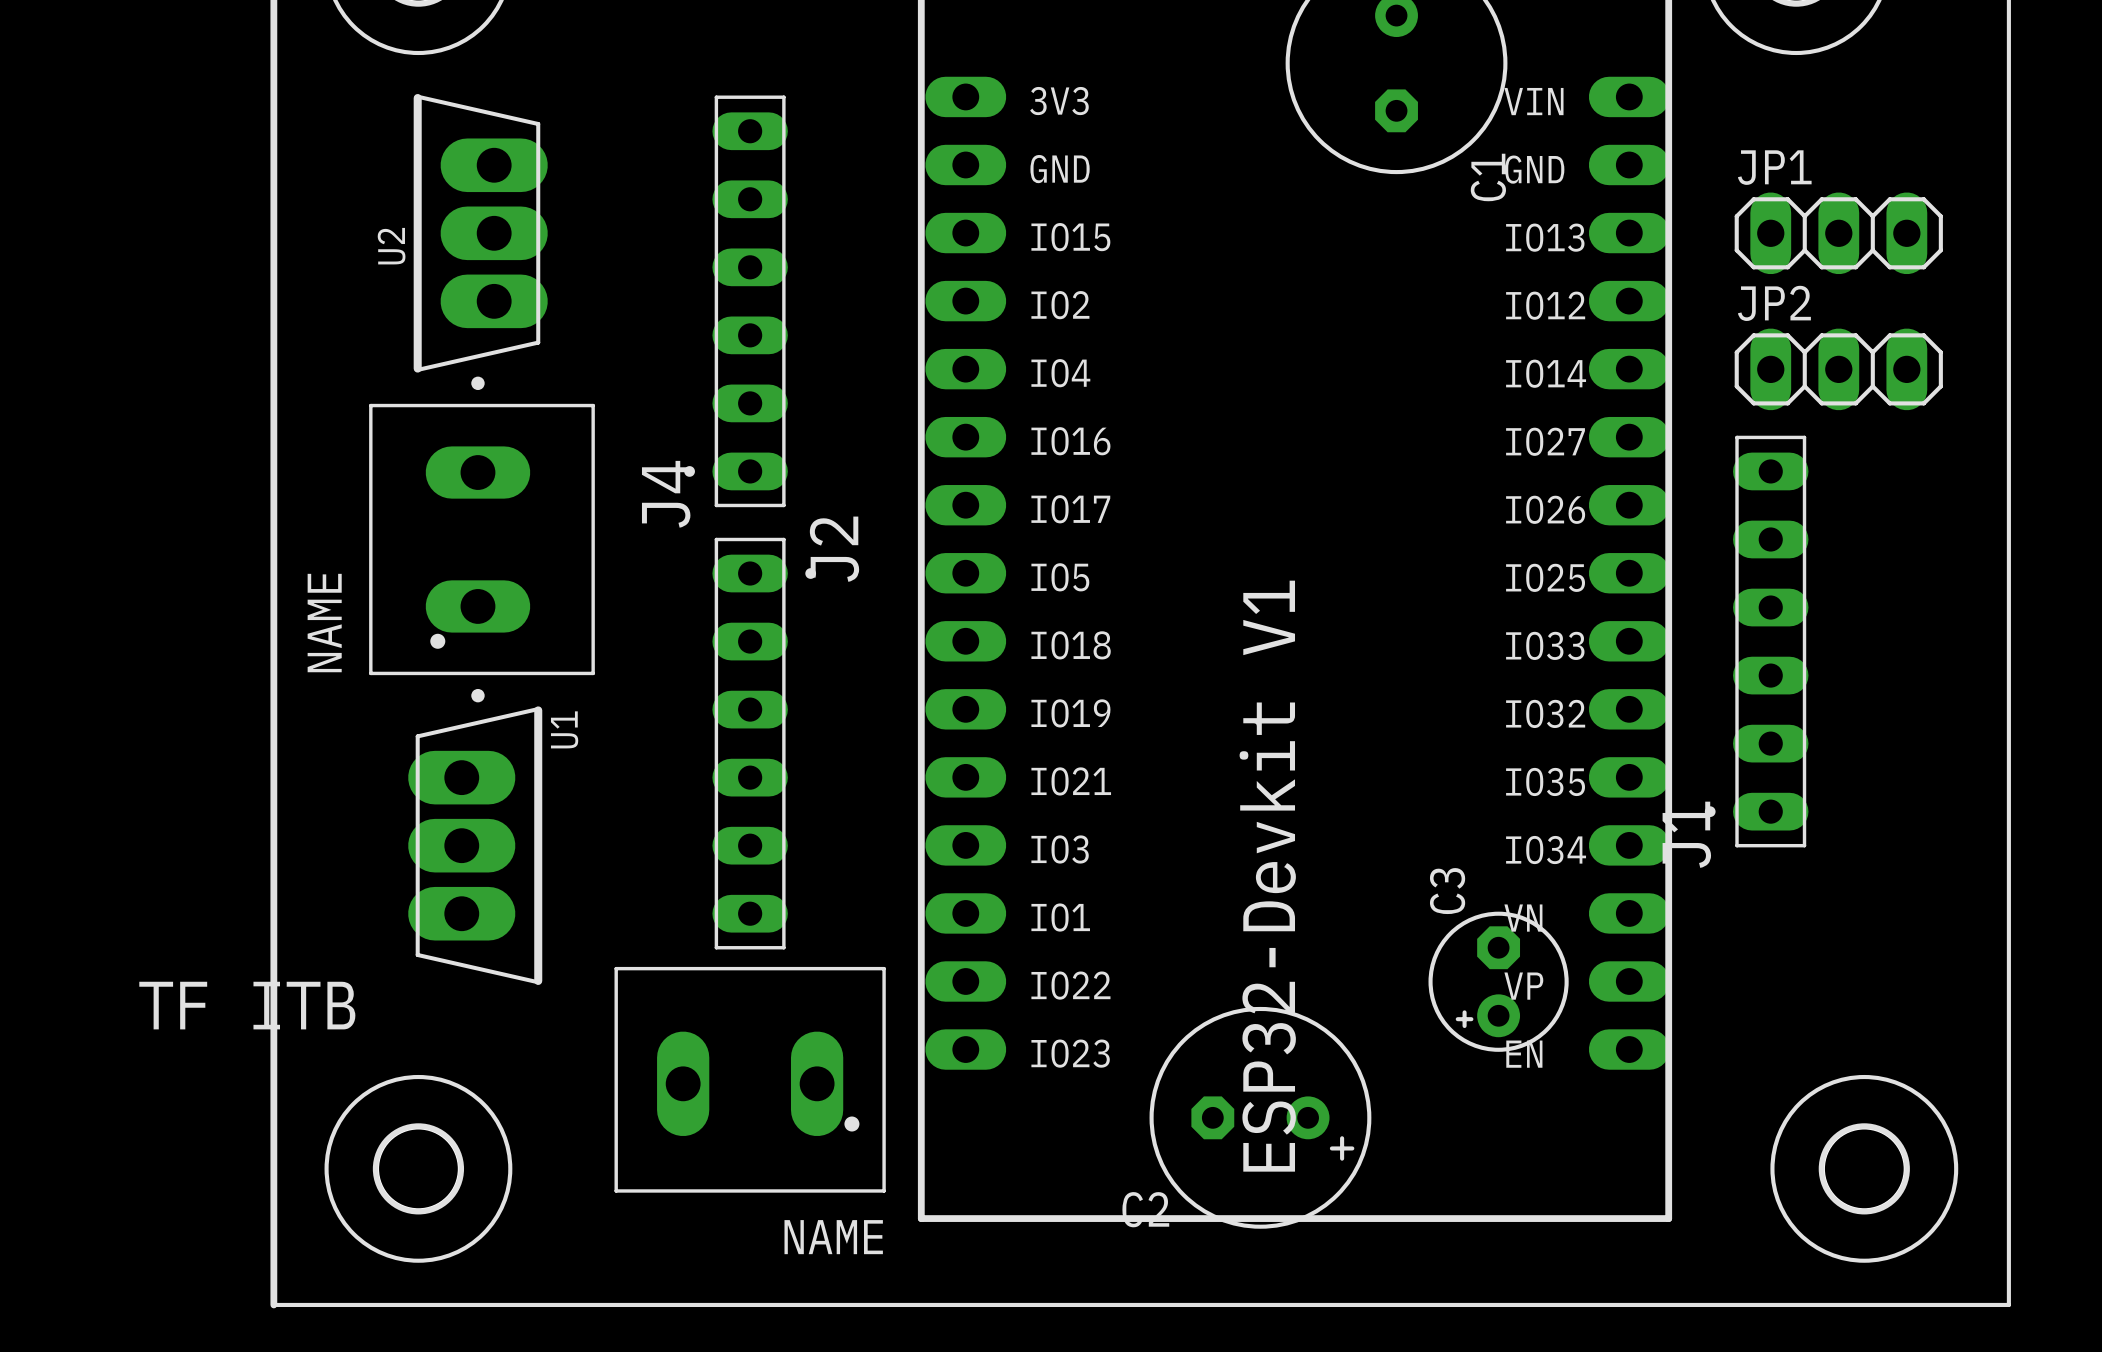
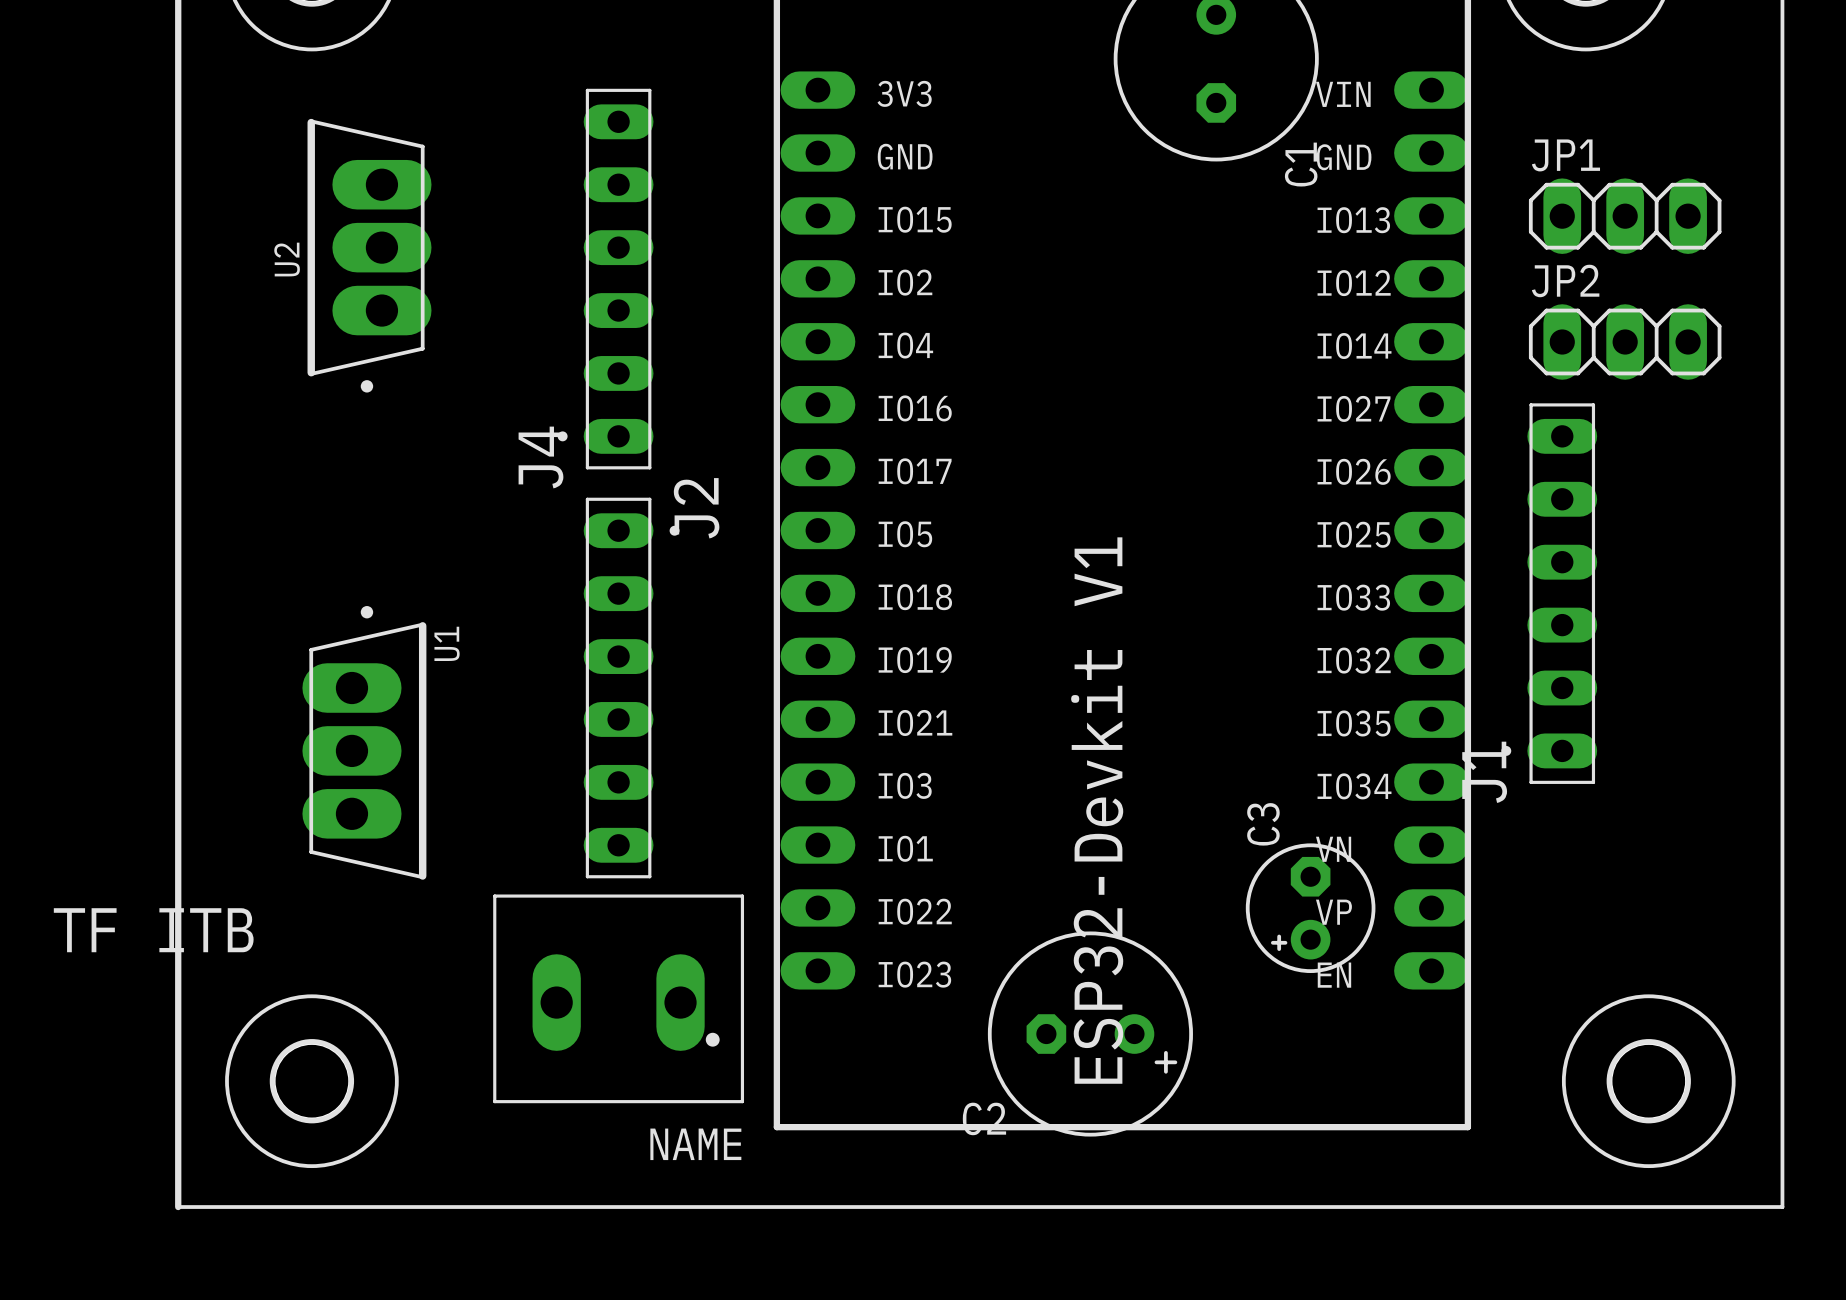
U2 position: (480, 242) -> (369, 255)
part: (481, 539) -> none
U1 position: (475, 836) -> (364, 742)

